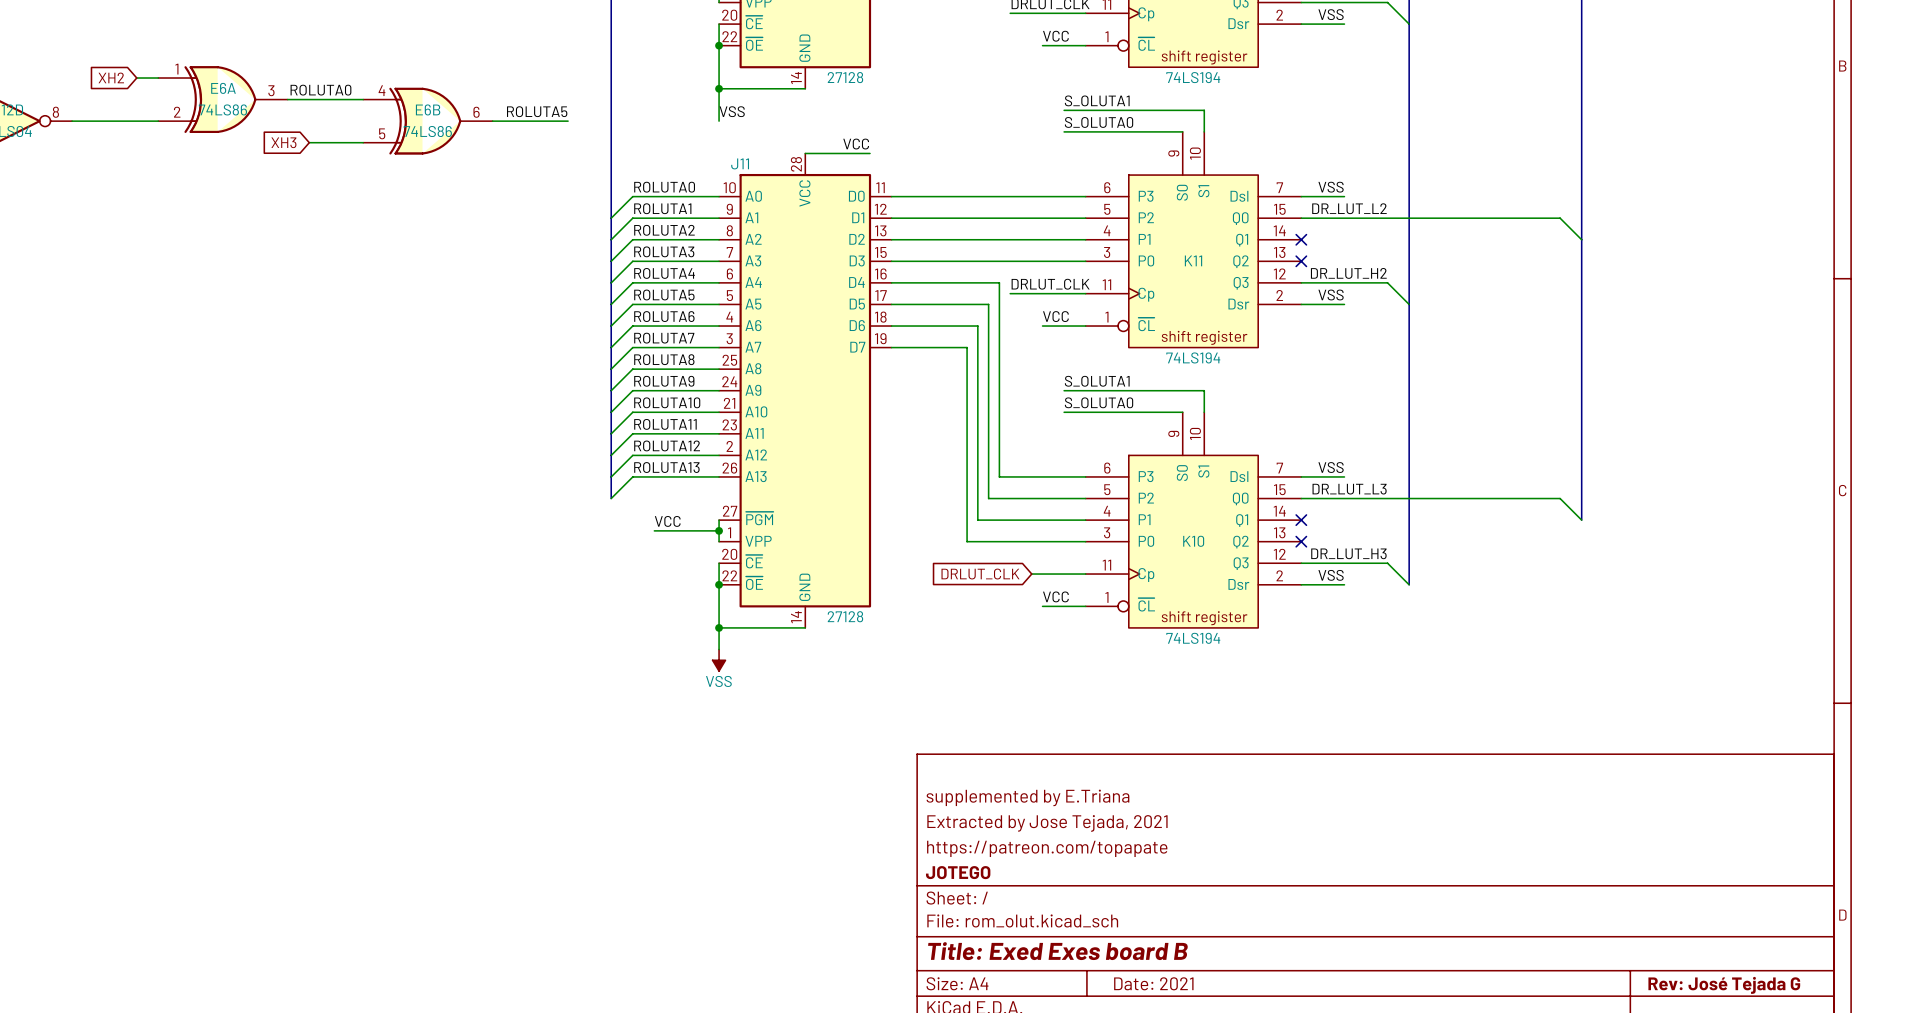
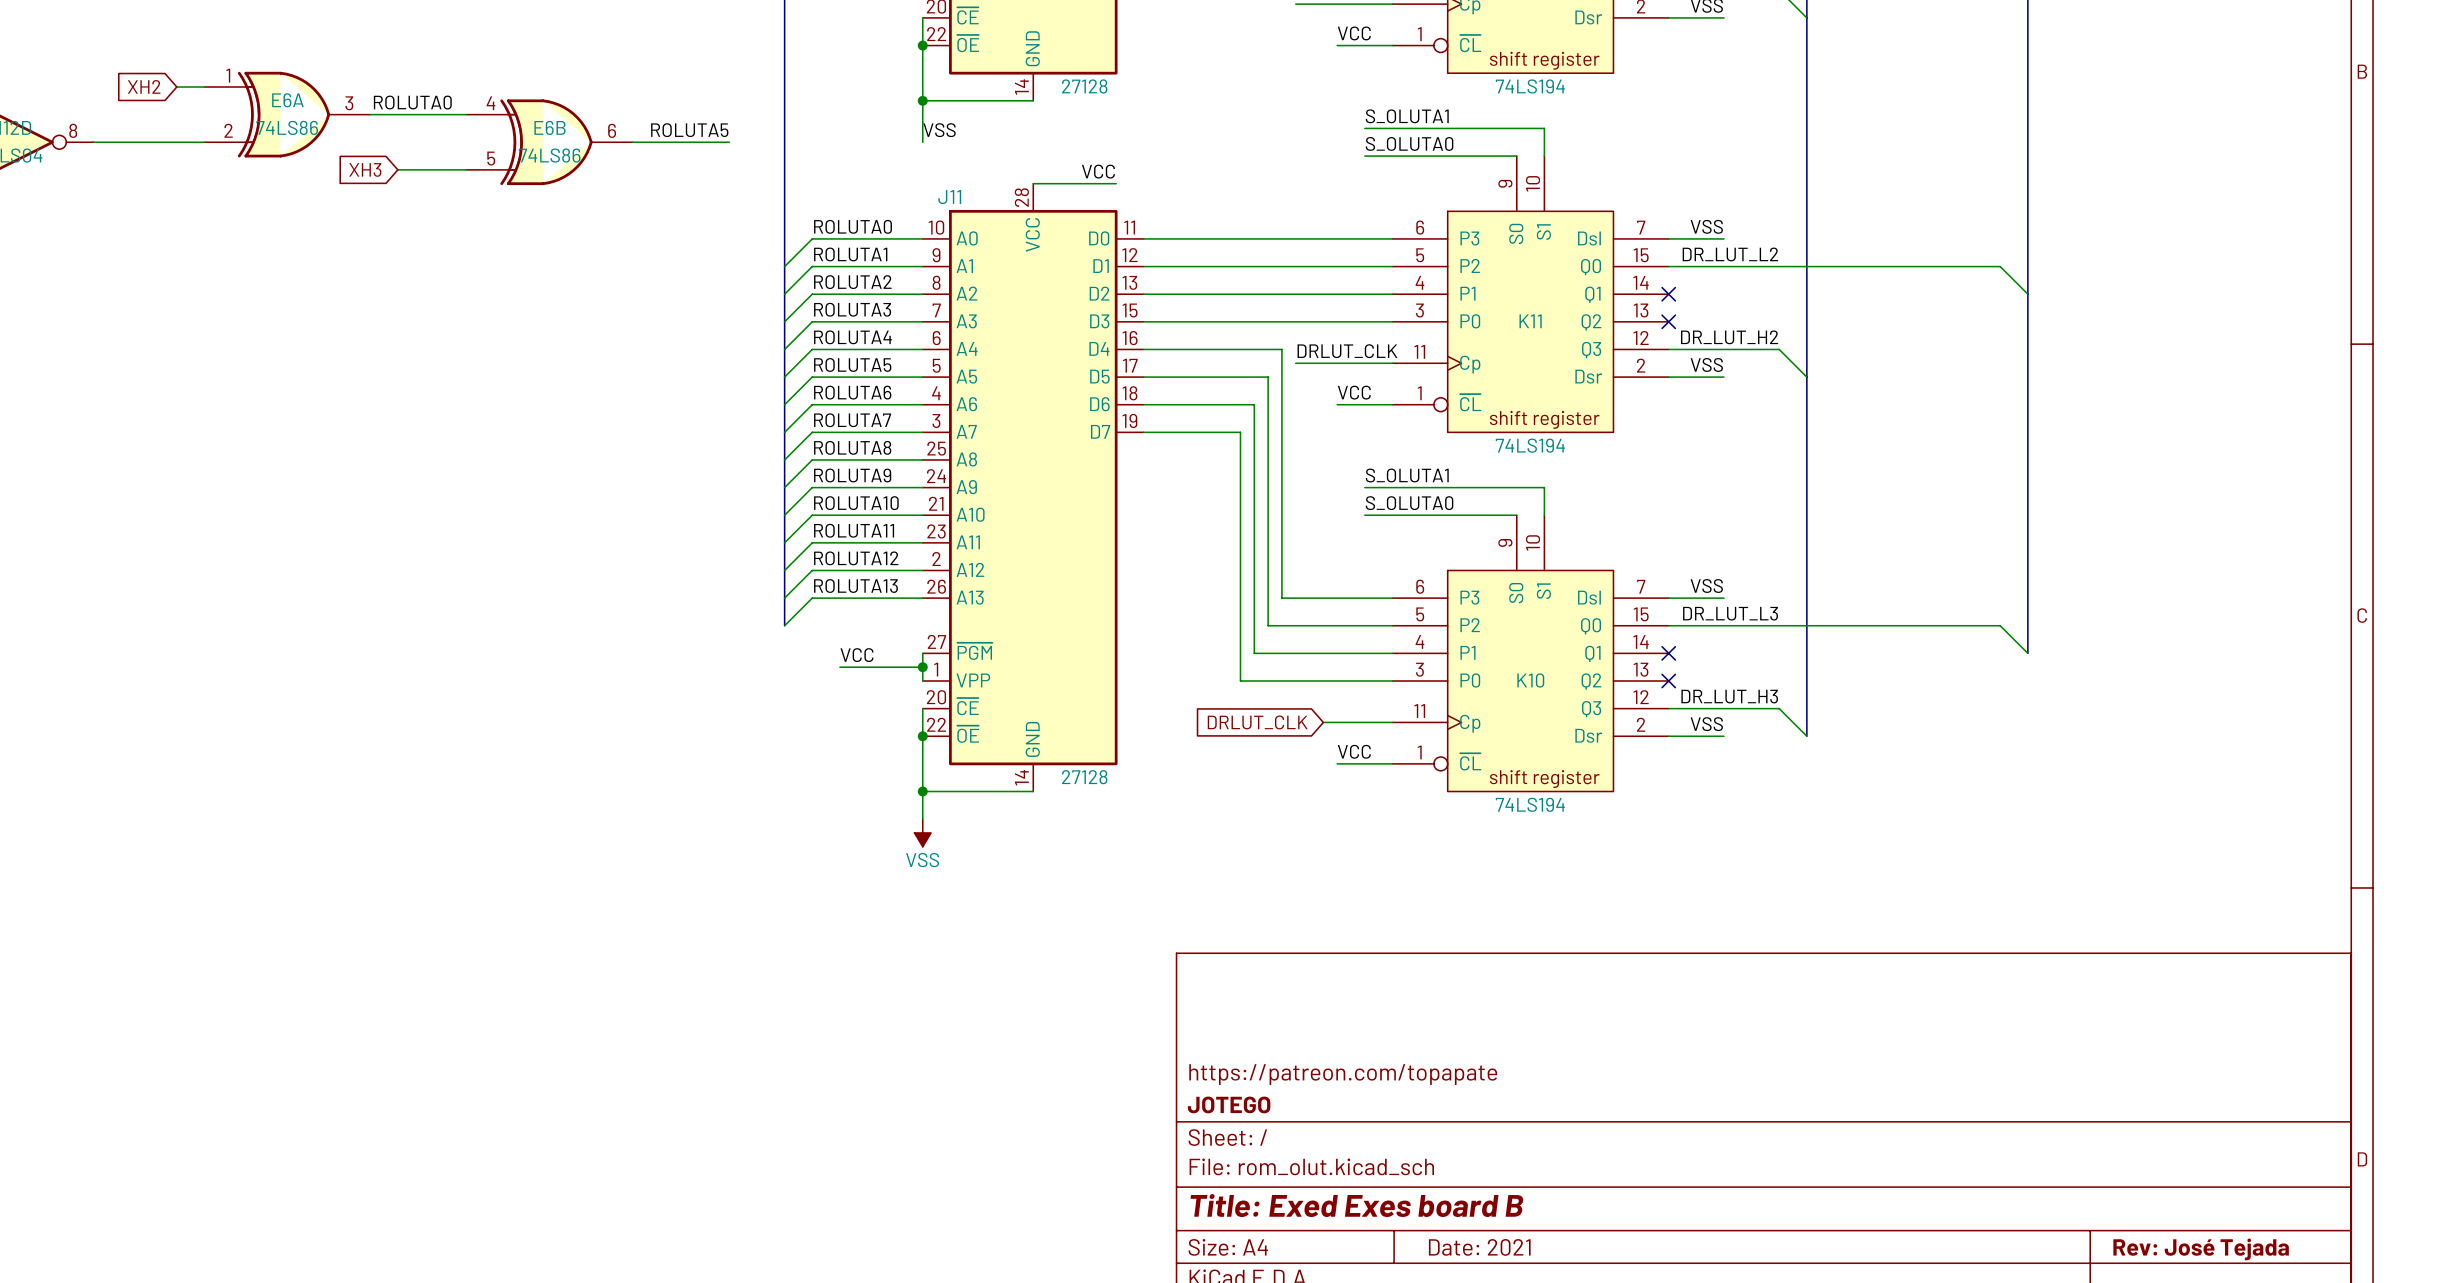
title block: supplemented by E.Triana (1027, 797) -> none
title block: Extracted by Jose Tejada, 2021 (1047, 823) -> none
title block: Rev: José Tejada G (1724, 985) -> Rev: José Tejada (2201, 1249)

